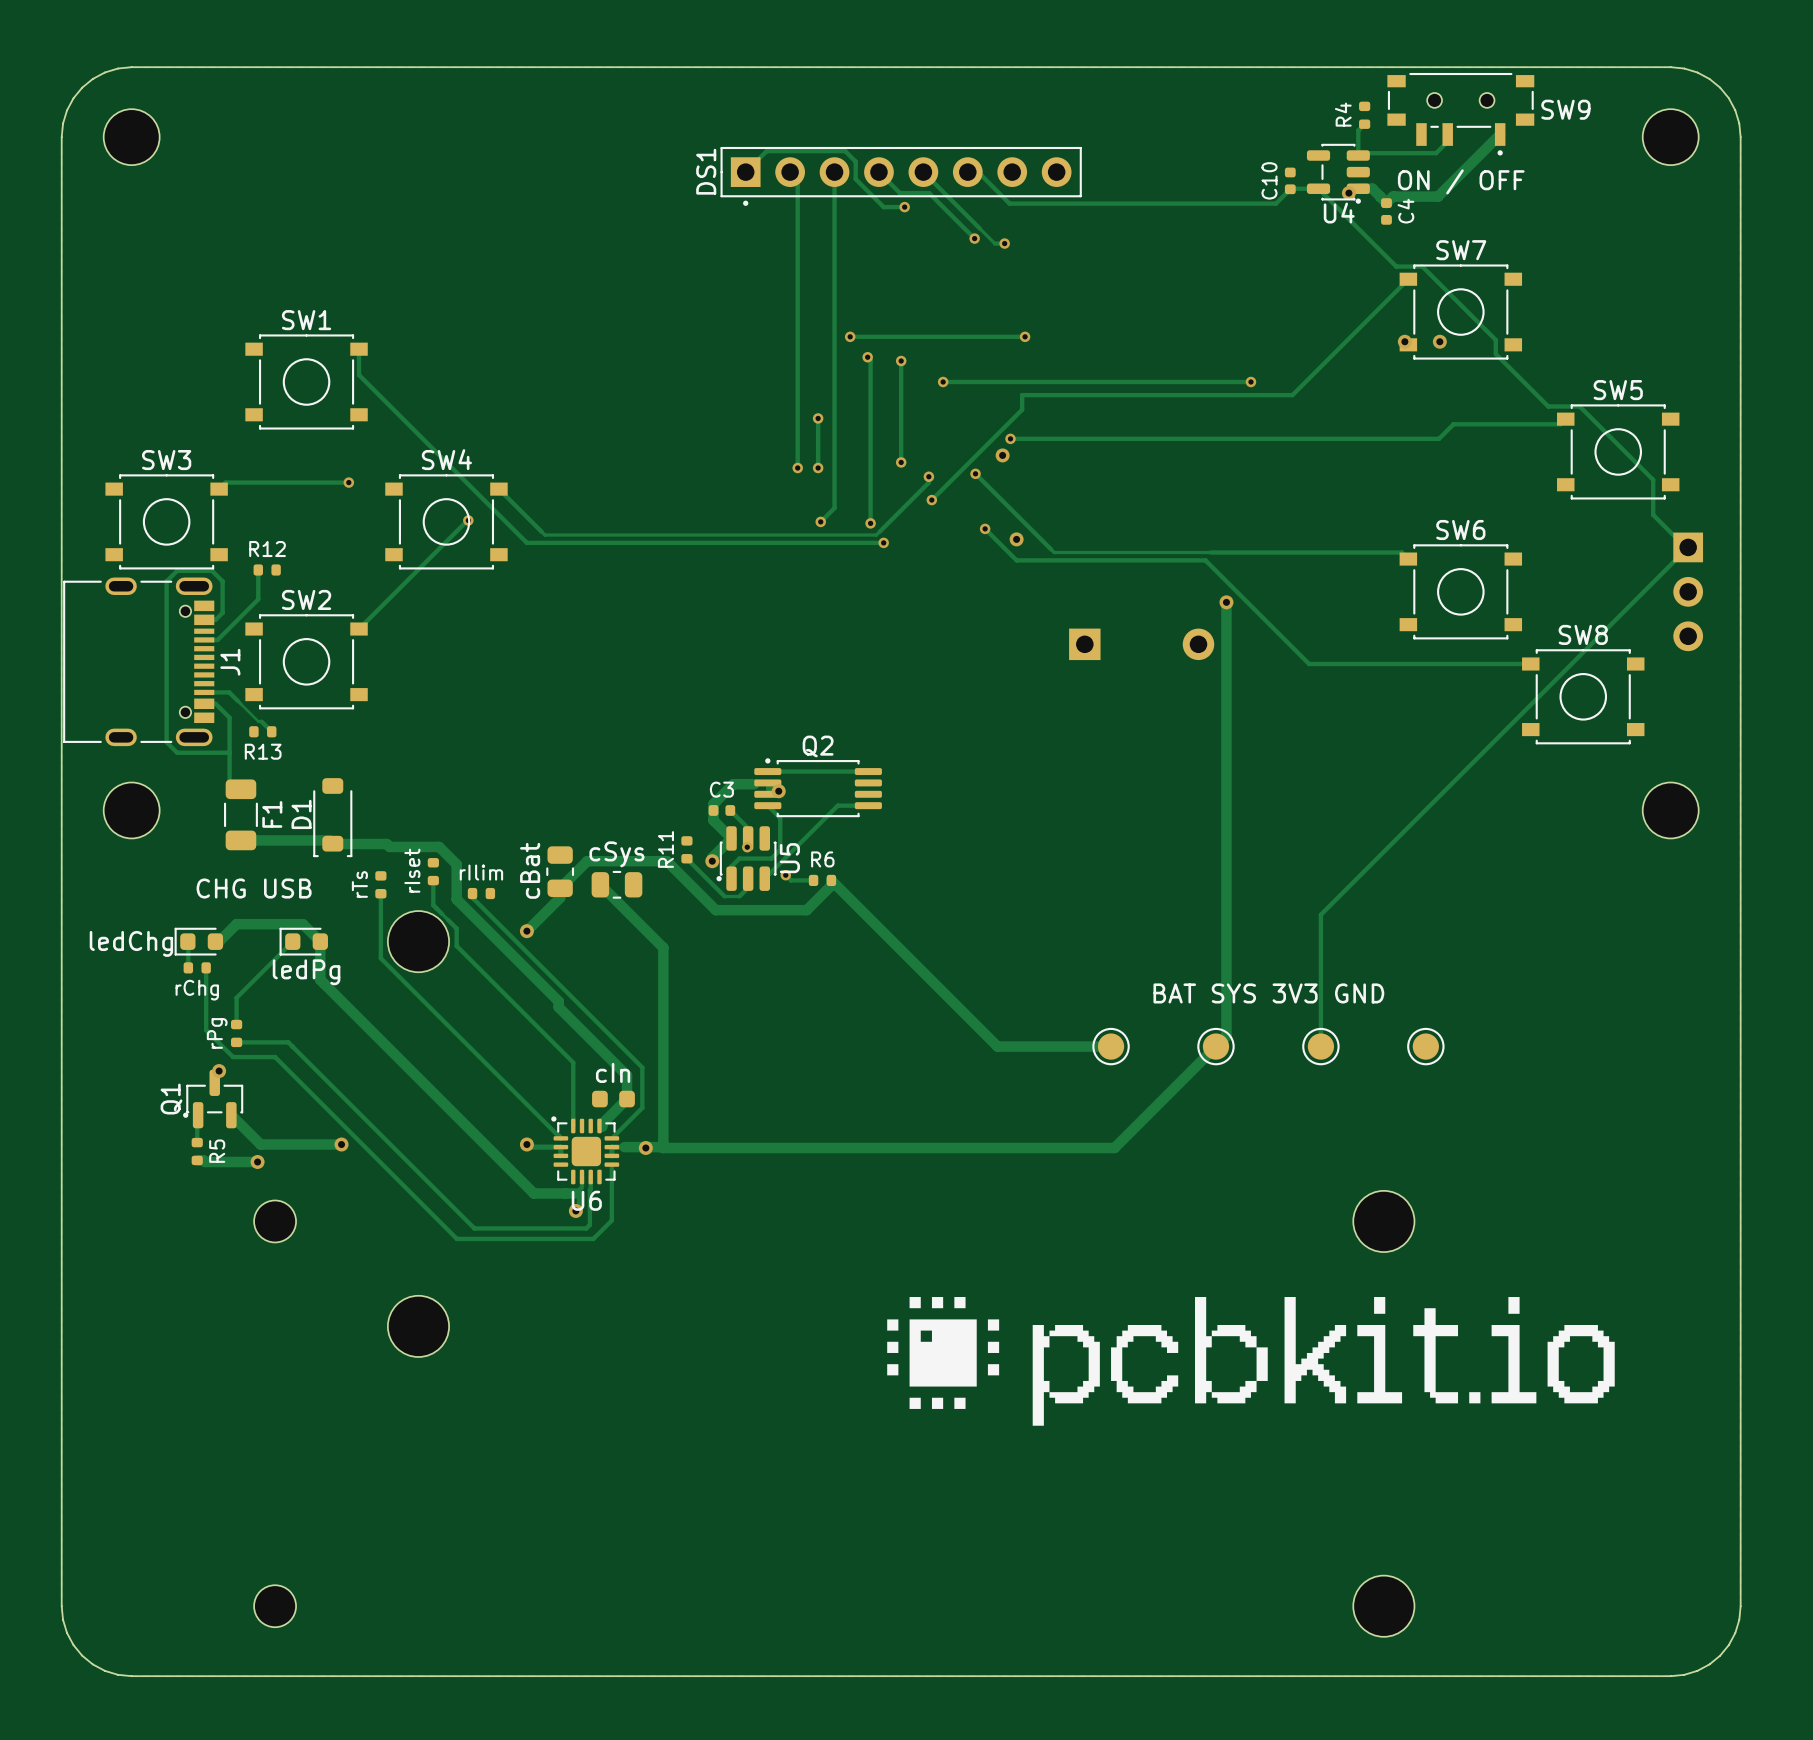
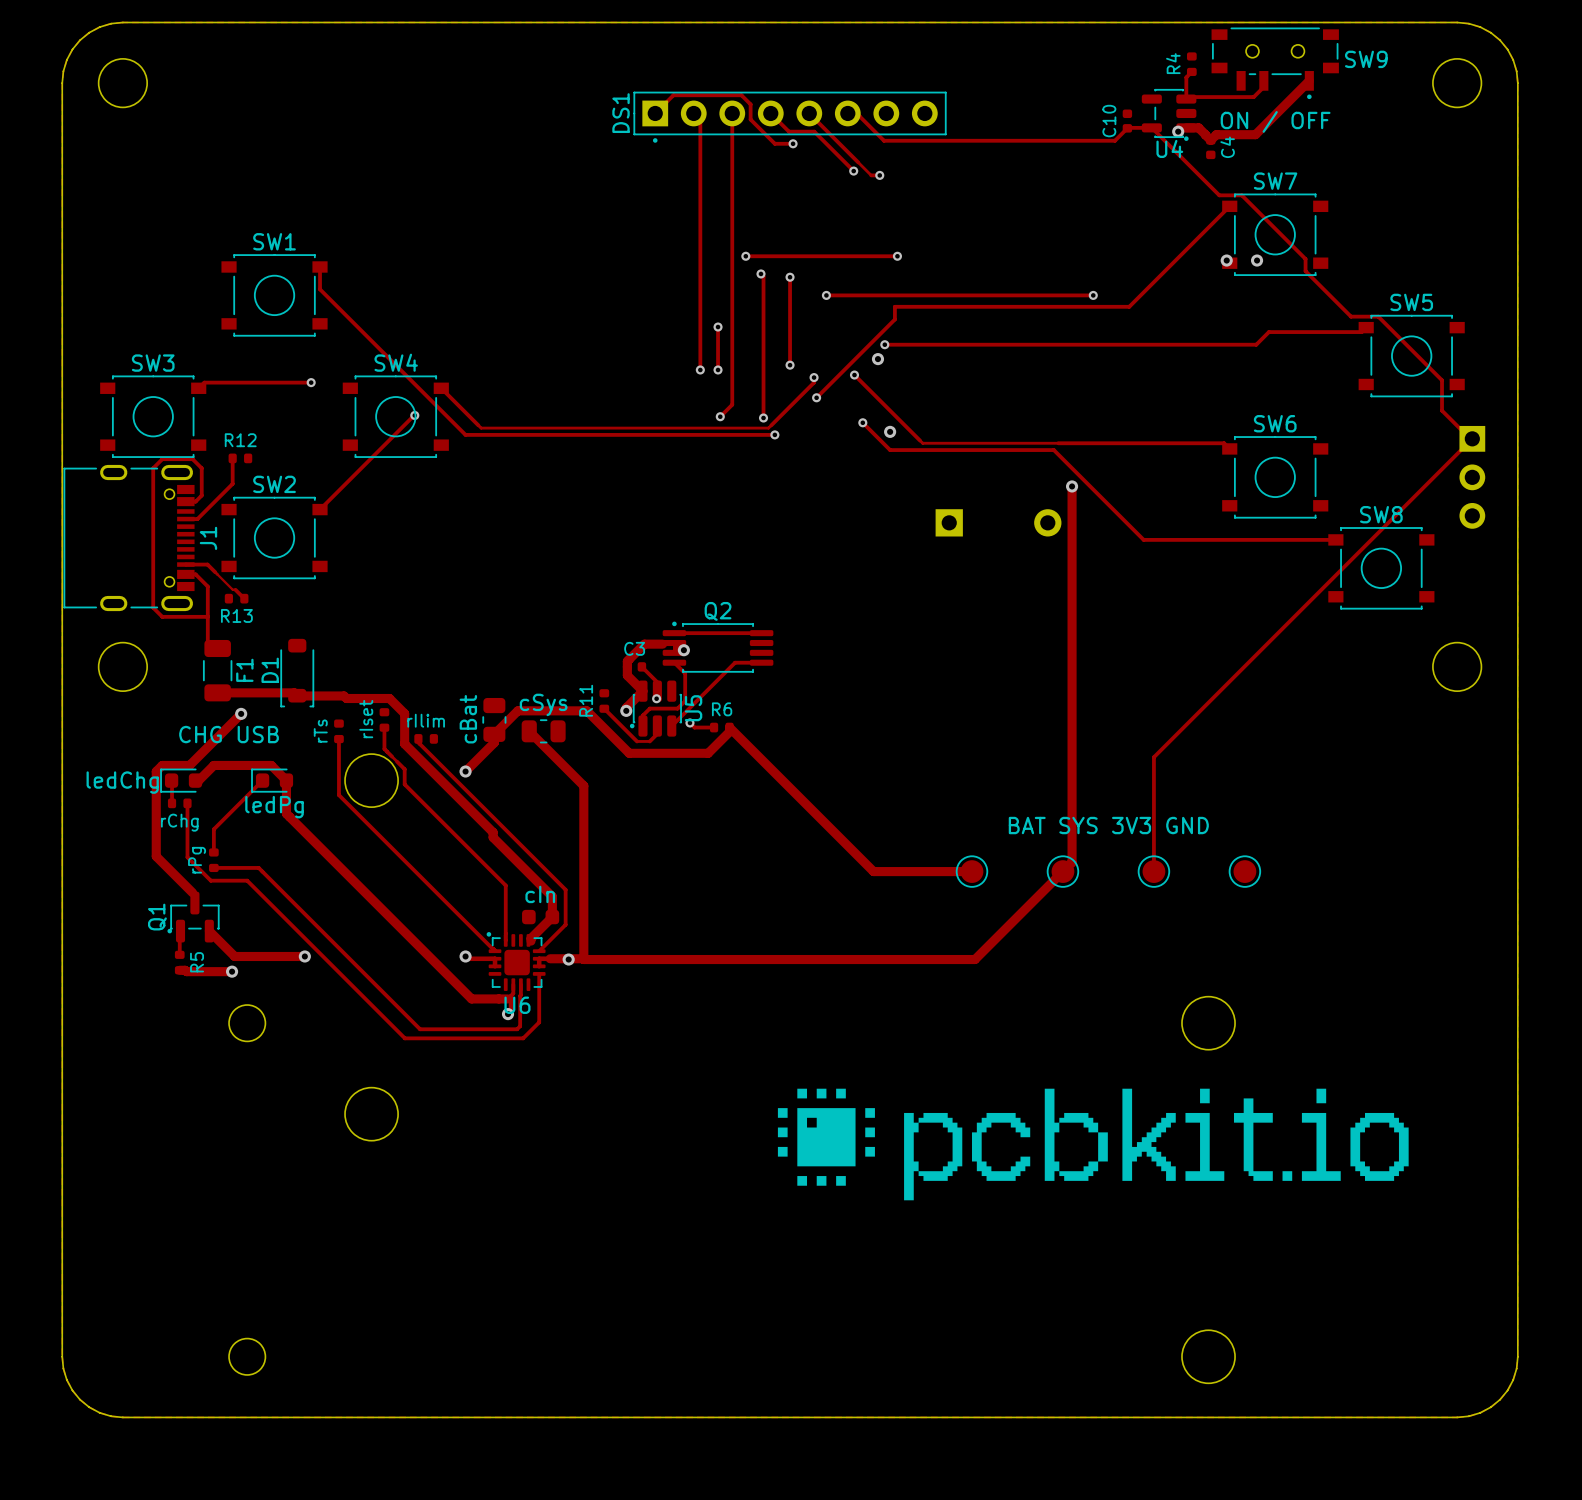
track: none -> (241, 713) (189, 765) (162, 765) (156, 771) (156, 856) (192, 892)
via: none -> (241, 713)
via: (219, 1071) -> none

